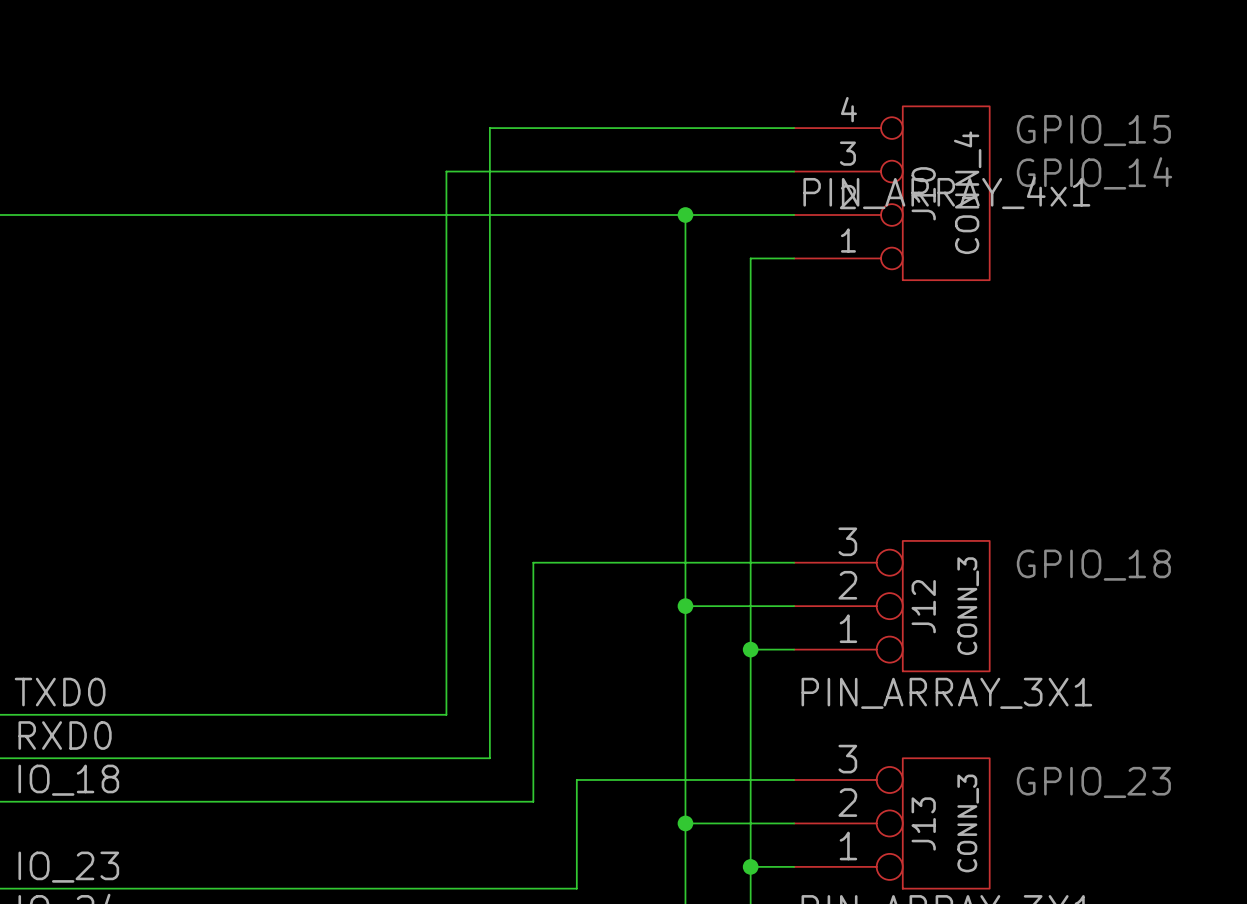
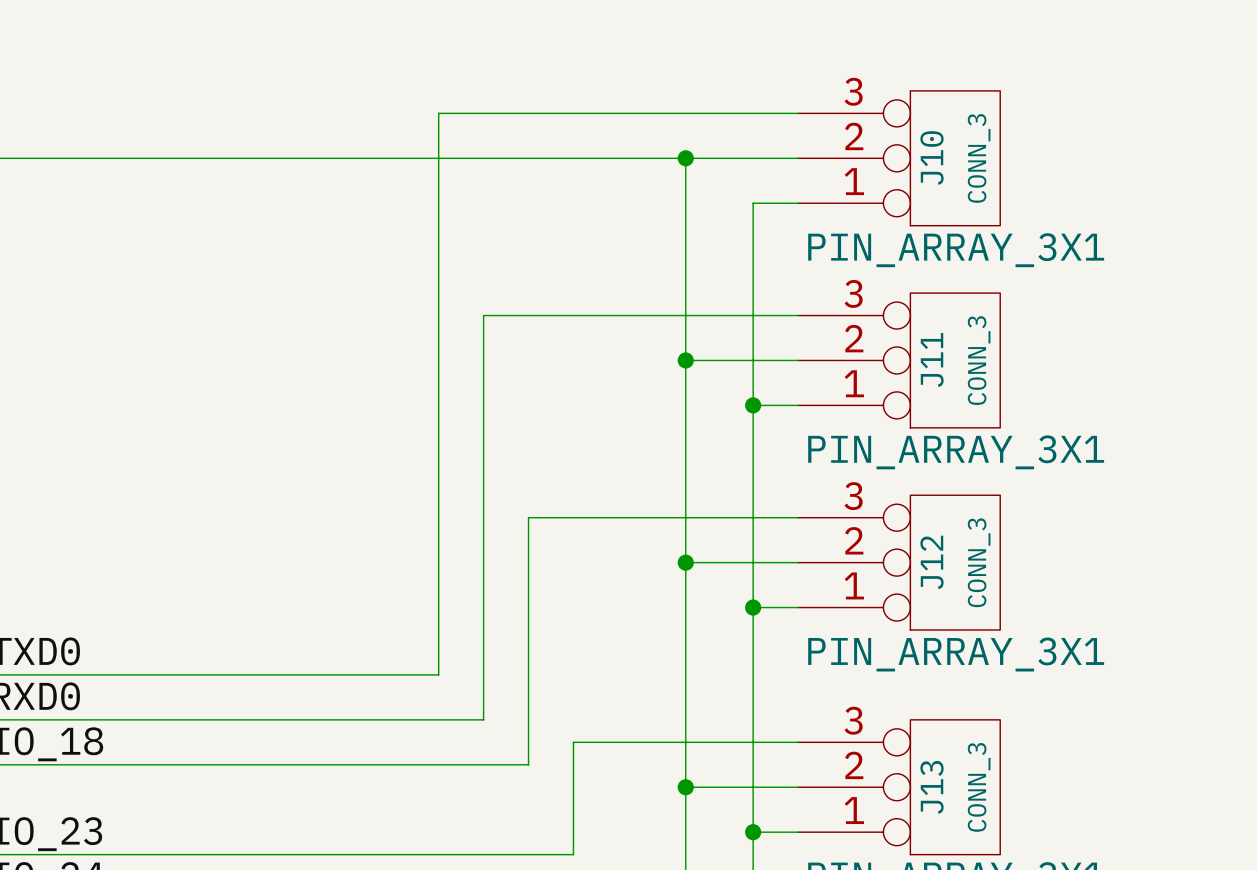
J10 symbol: [794, 106, 990, 281] -> [798, 90, 1001, 226]
wire: (794, 128) (489, 128) (489, 367) -> (798, 315) (483, 315)
text: GPIO_15 (1093, 130) -> none
text: GPIO_14 (1094, 173) -> none
J10 text: PIN_ARRAY_4x1 (946, 192) -> PIN_ARRAY_3X1 (956, 250)
J10 value: CONN_4 (967, 192) -> CONN_3 (979, 158)
wire: none -> (685, 360) (798, 360)
junction: none -> (685, 360)
J11: none -> CONN_3 (899, 360)
wire: none -> (753, 405) (798, 405)
junction: none -> (753, 405)
text: GPIO_18 (1093, 565) -> none
text: GPIO_23 (1093, 782) -> none

